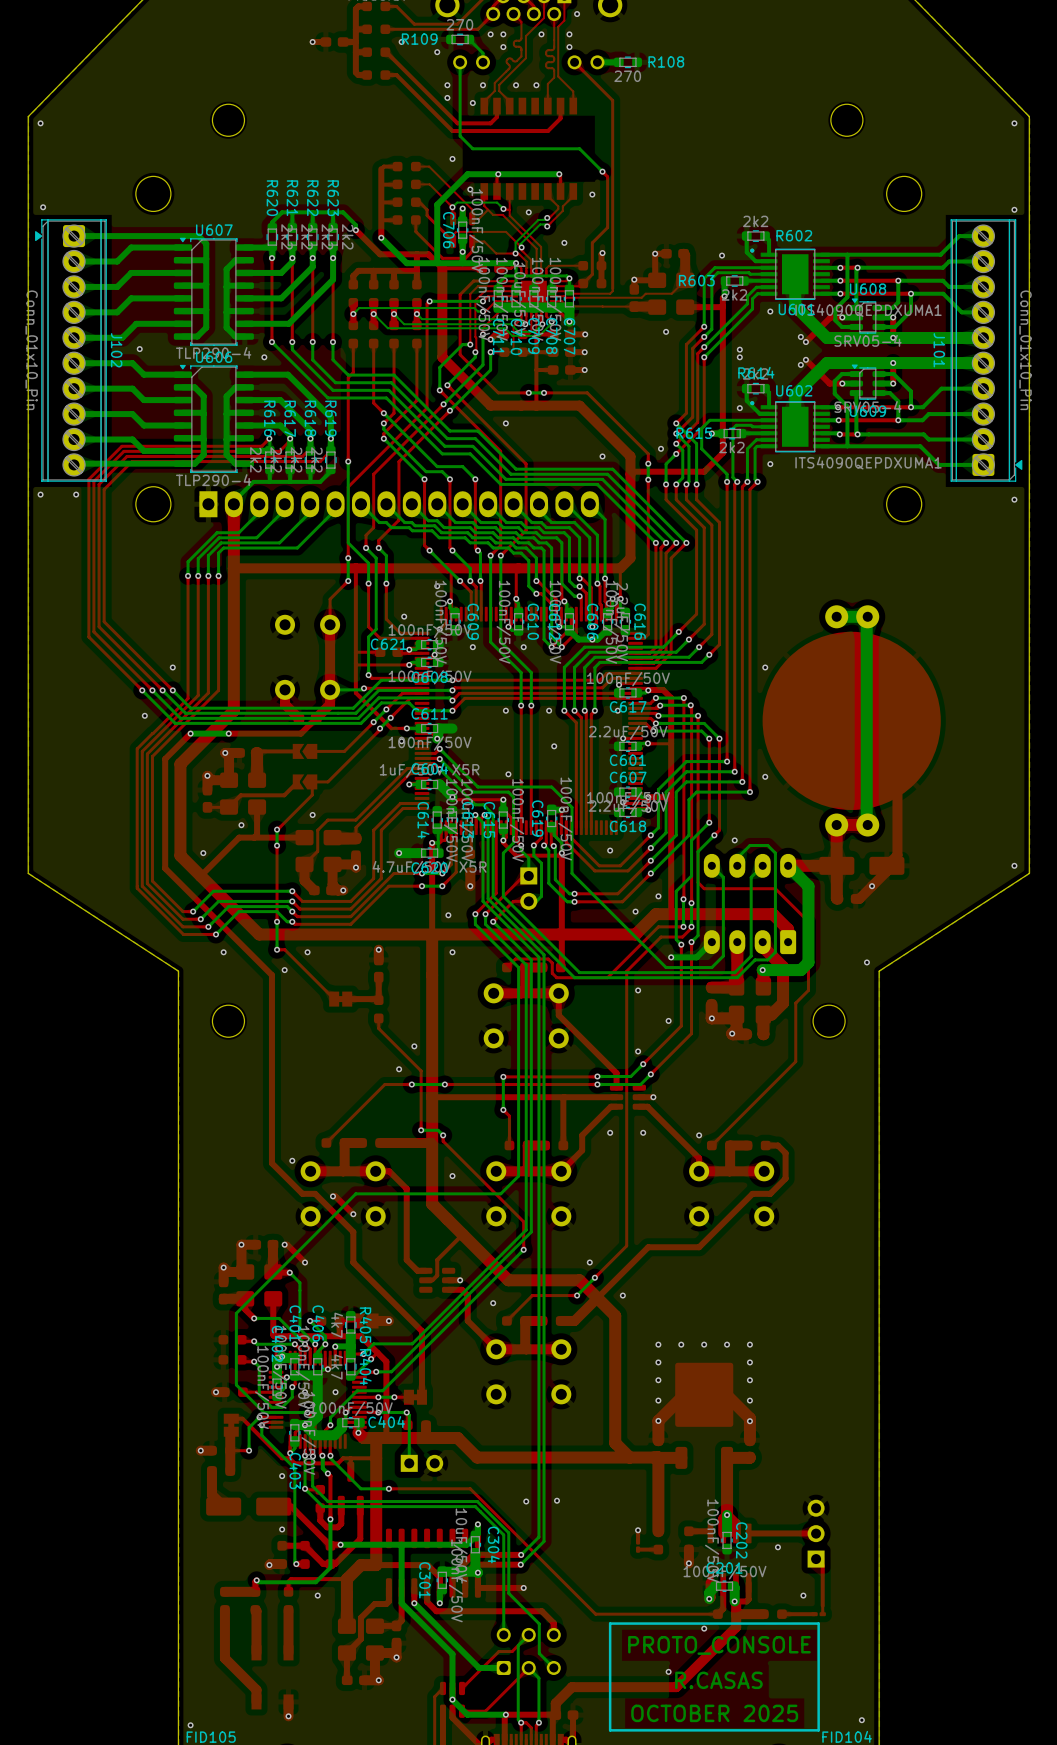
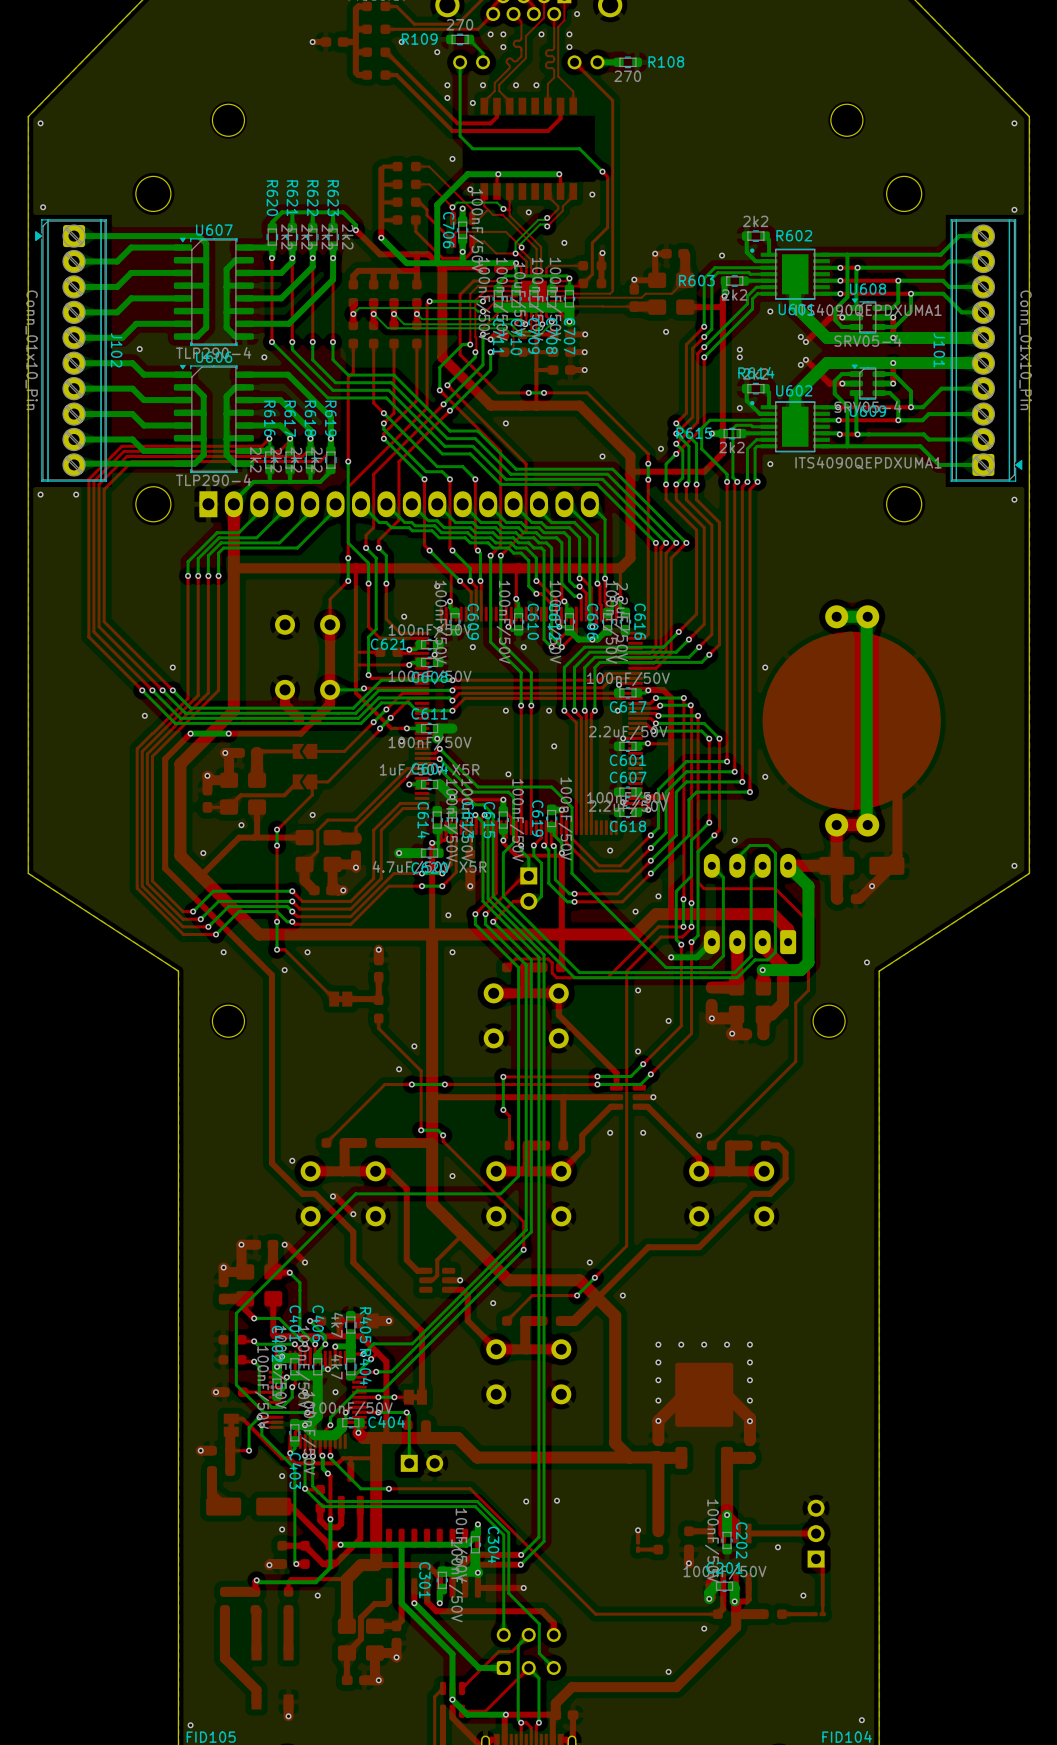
line: (818, 1623) (610, 1623) (610, 1730) (818, 1730) (818, 1623) -> none
text: PROTO_CONSOLE (719, 1645) -> none
text: R.CASAS (718, 1680) -> none
text: OCTOBER 2025 (714, 1713) -> none

